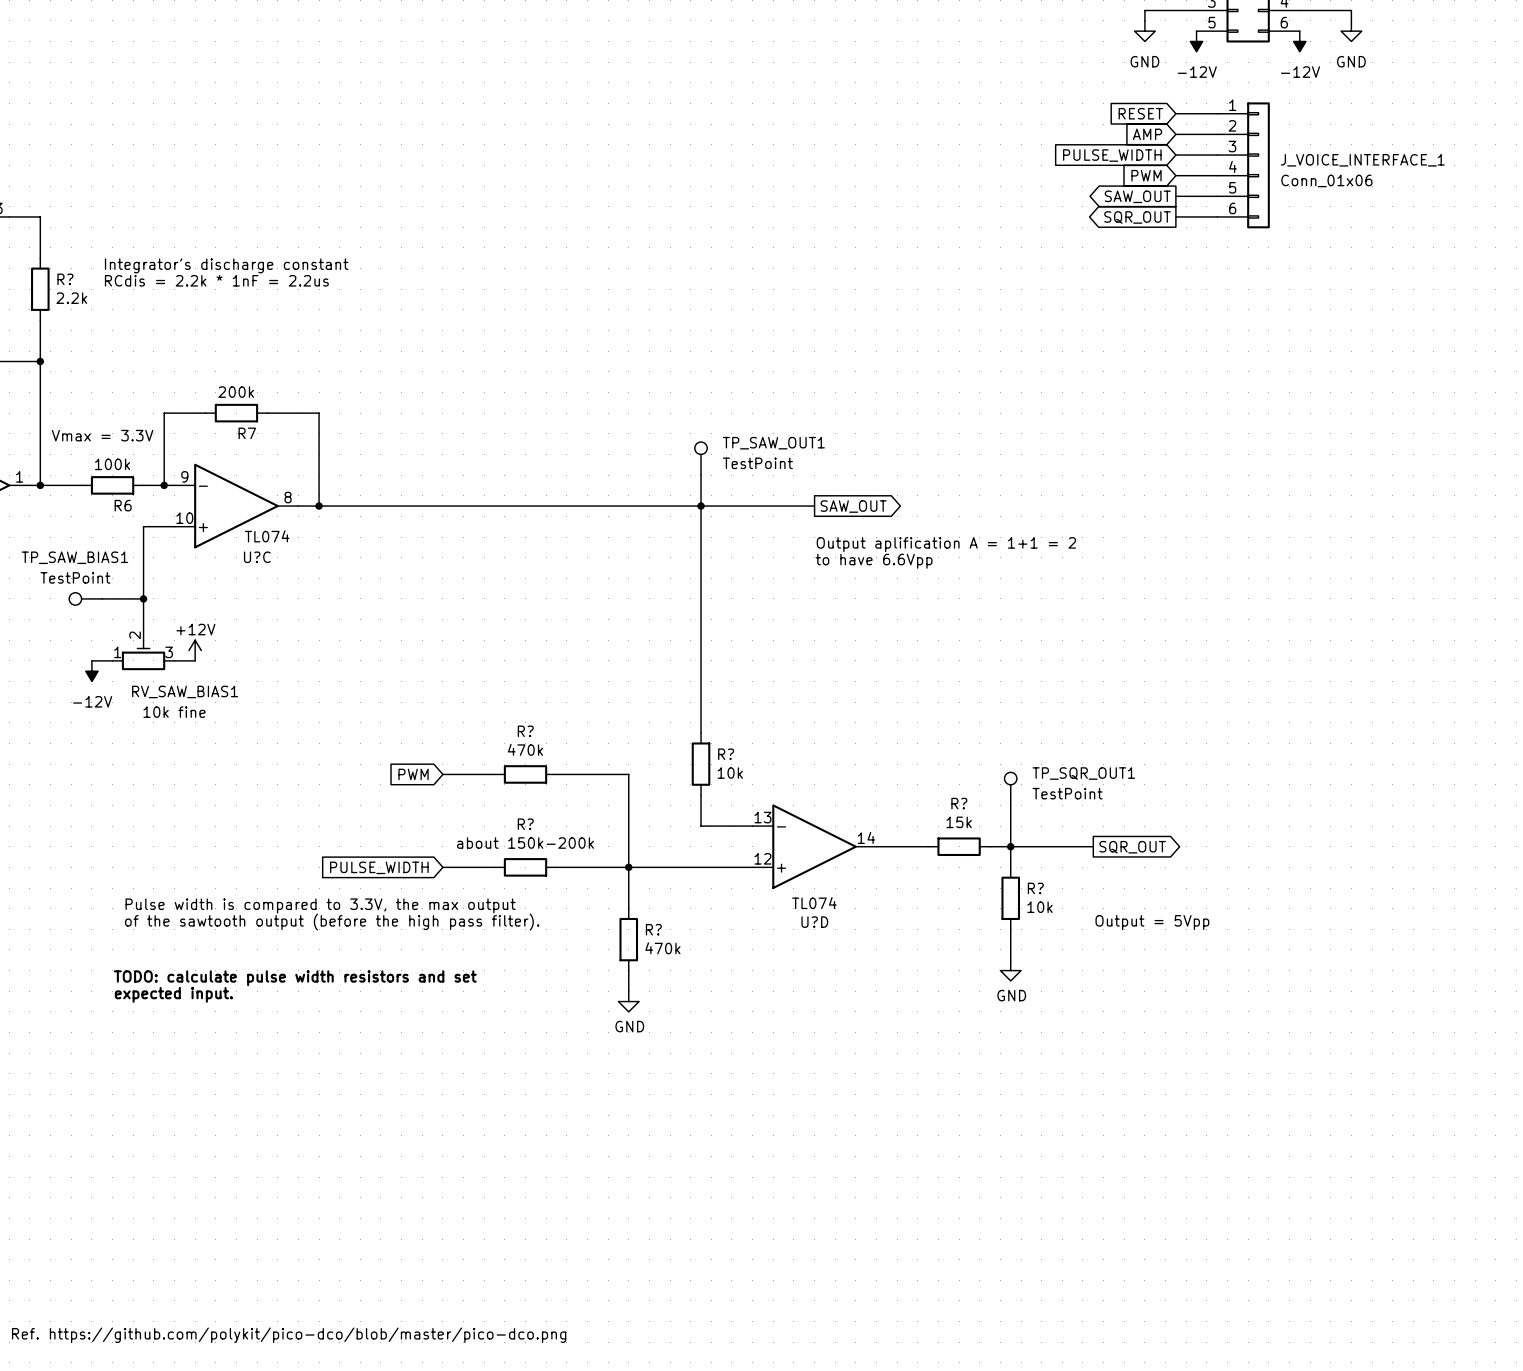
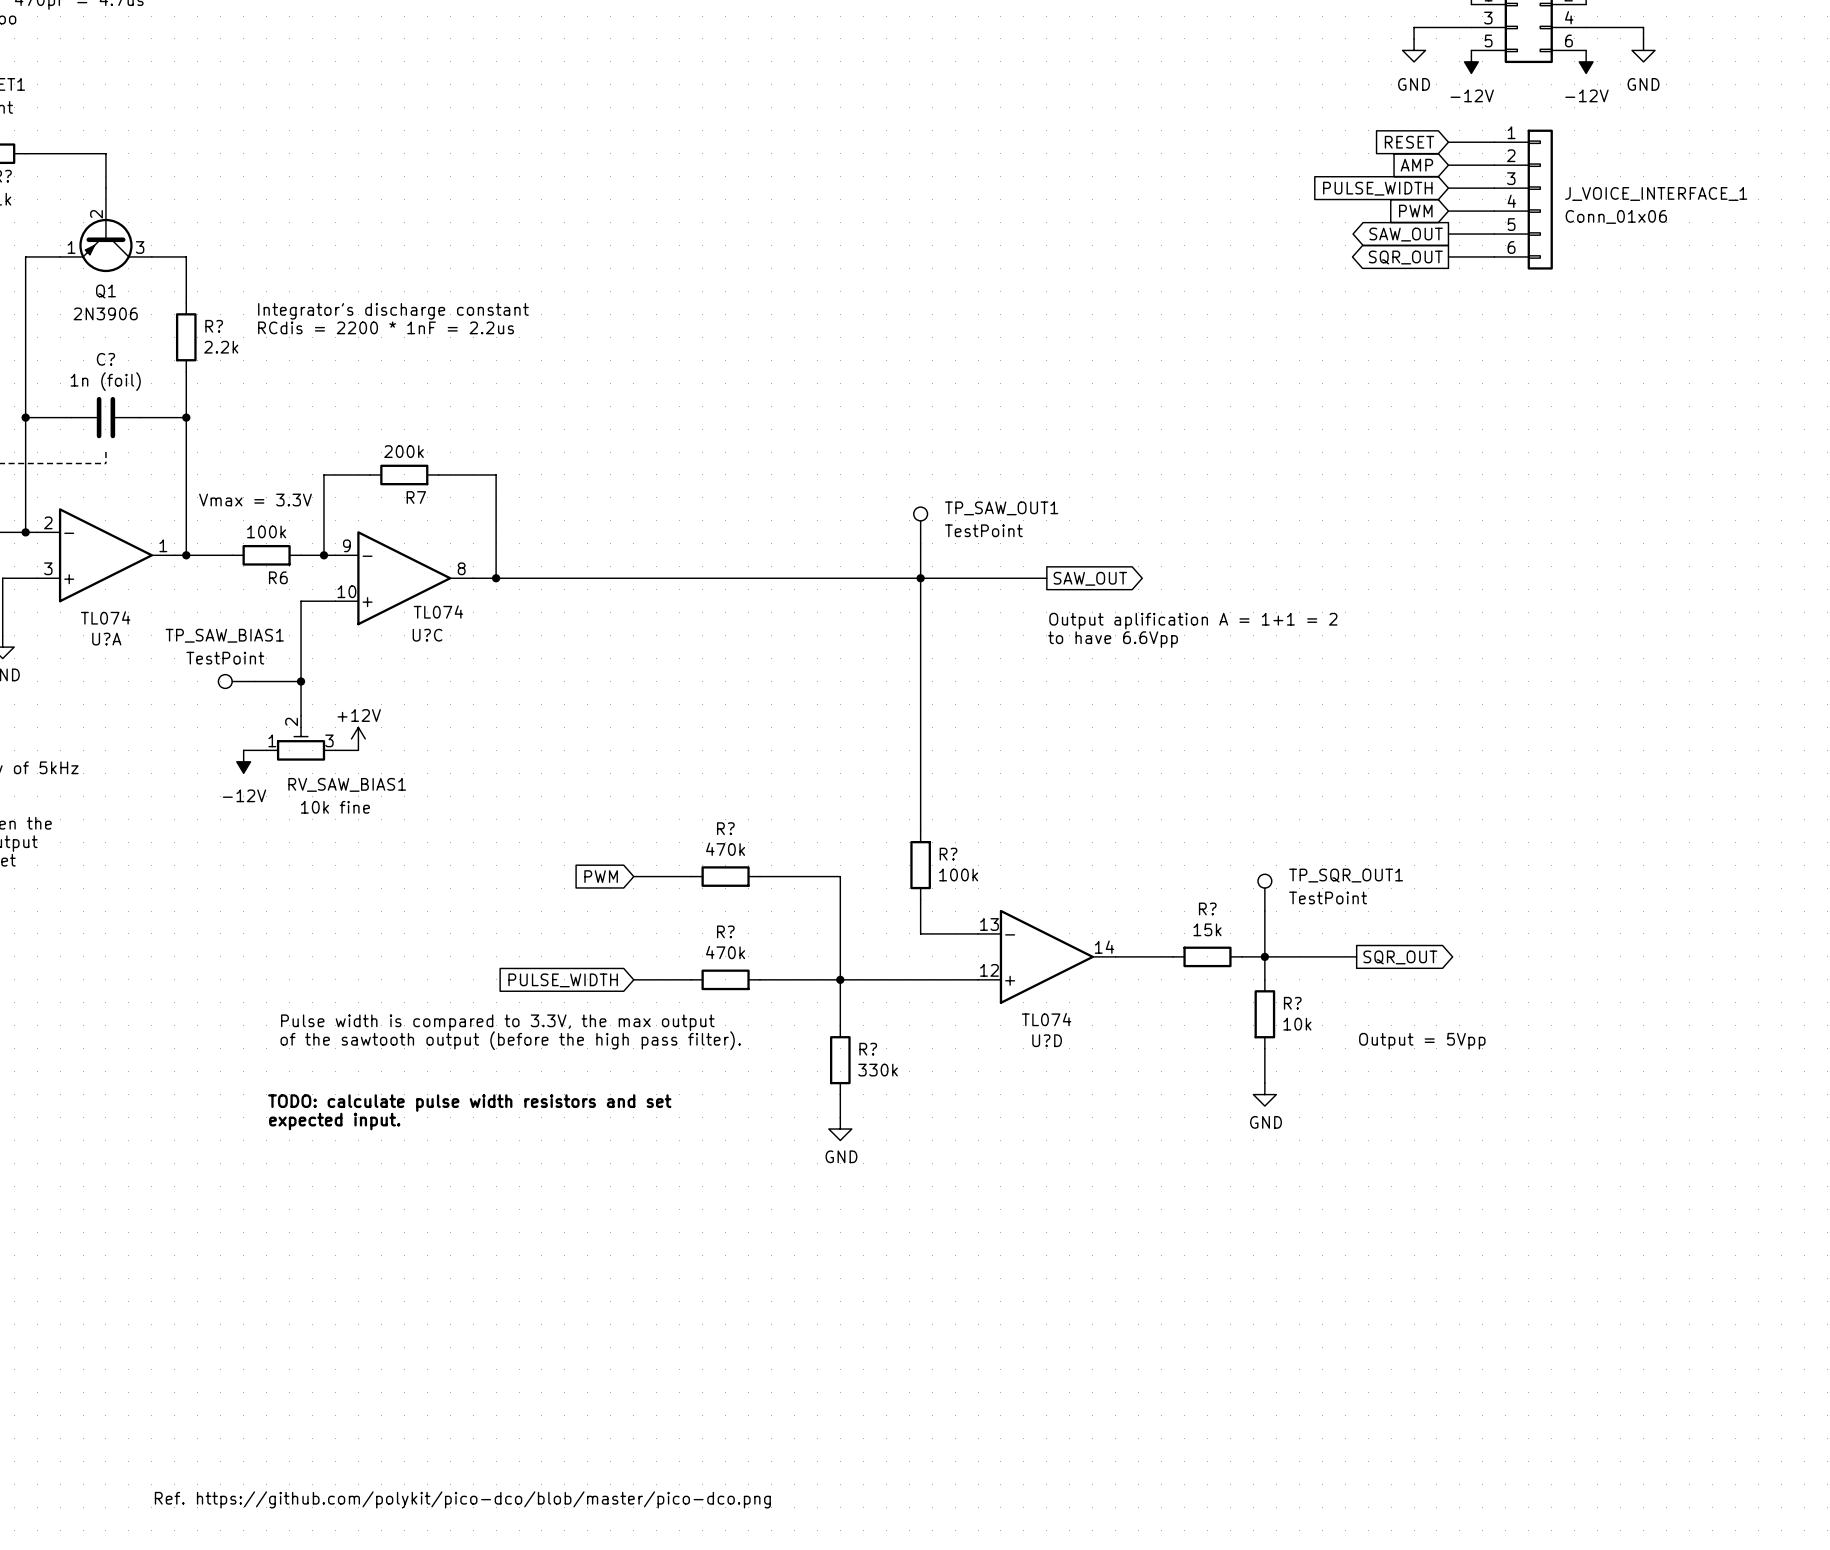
text: RCdis = 2.2k * 1nF = 2.2us (216, 280) -> RCdis = 2200 * 1nF = 2.2us (386, 327)
R? value: 10k (730, 773) -> 100k (958, 875)
R? value: about 150k-200k (525, 843) -> 470k (725, 952)
R? value: 470k (662, 948) -> 330k (878, 1070)

